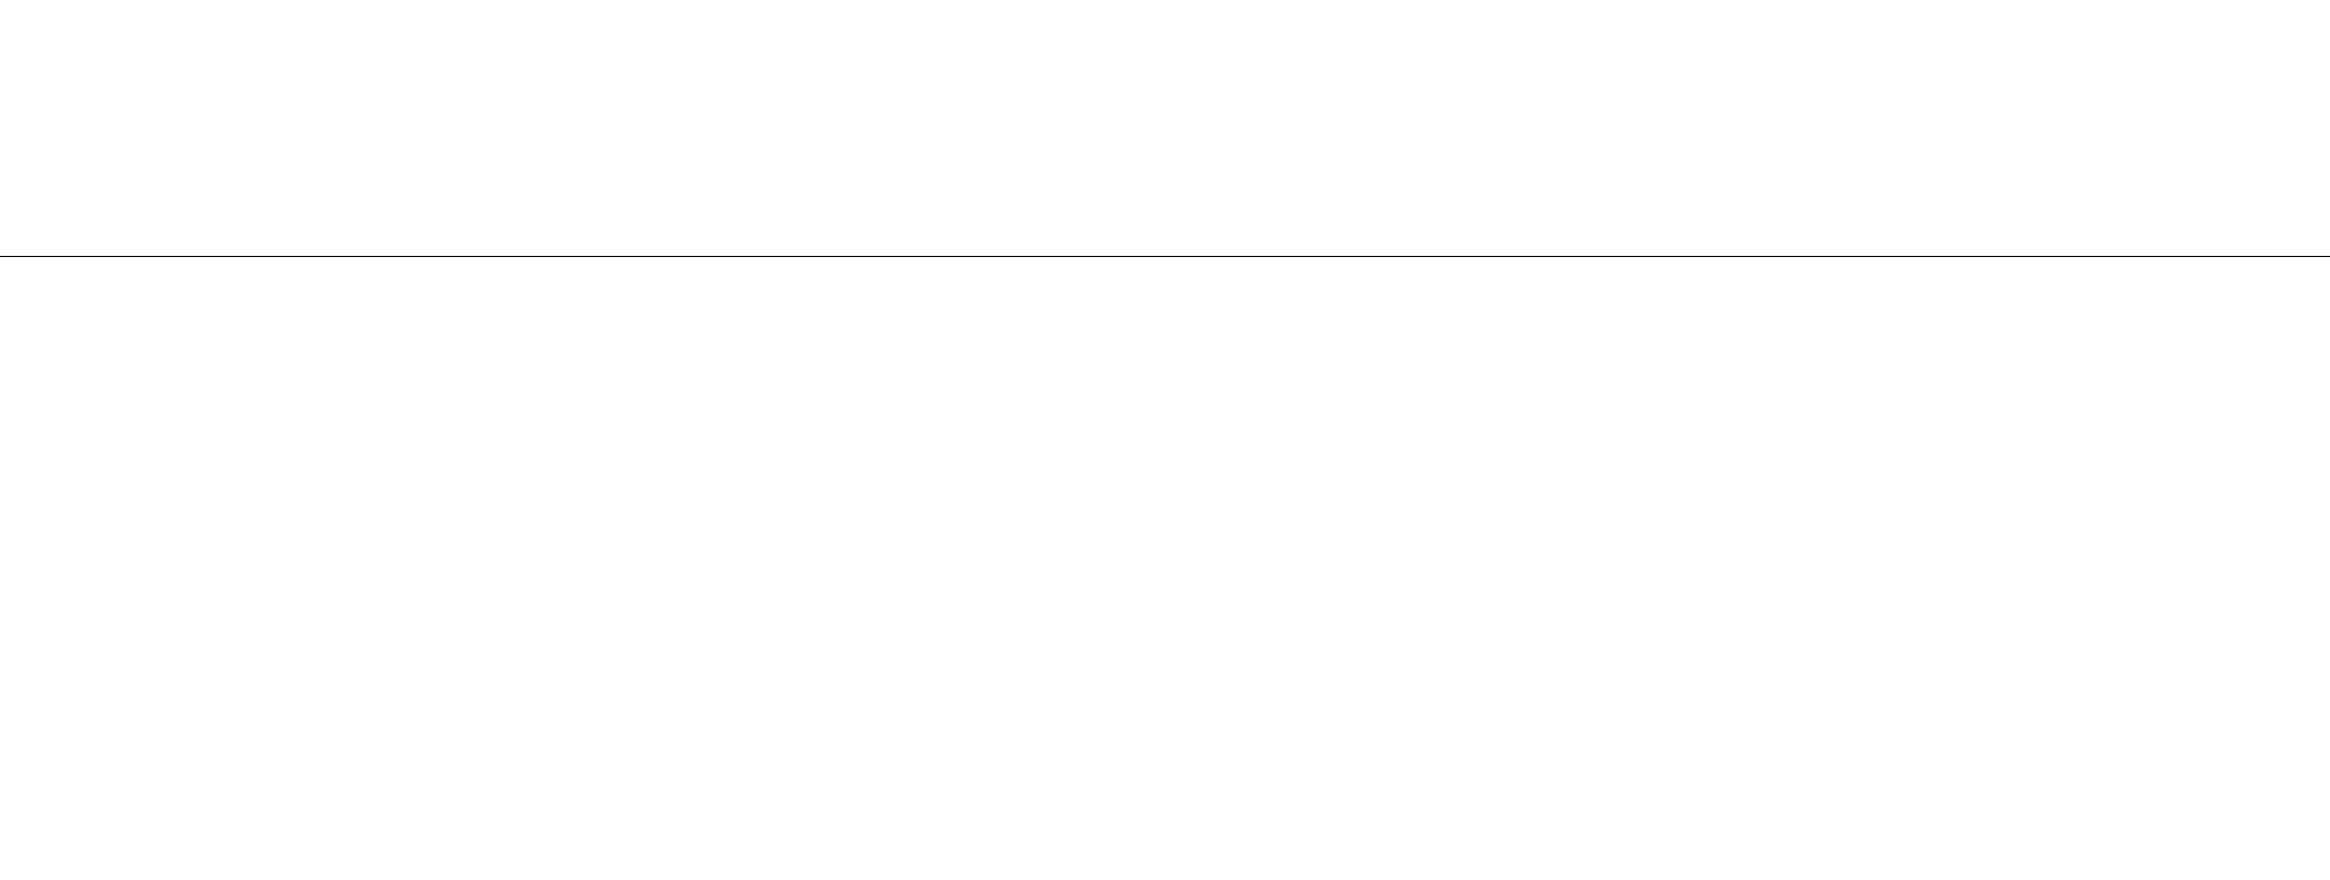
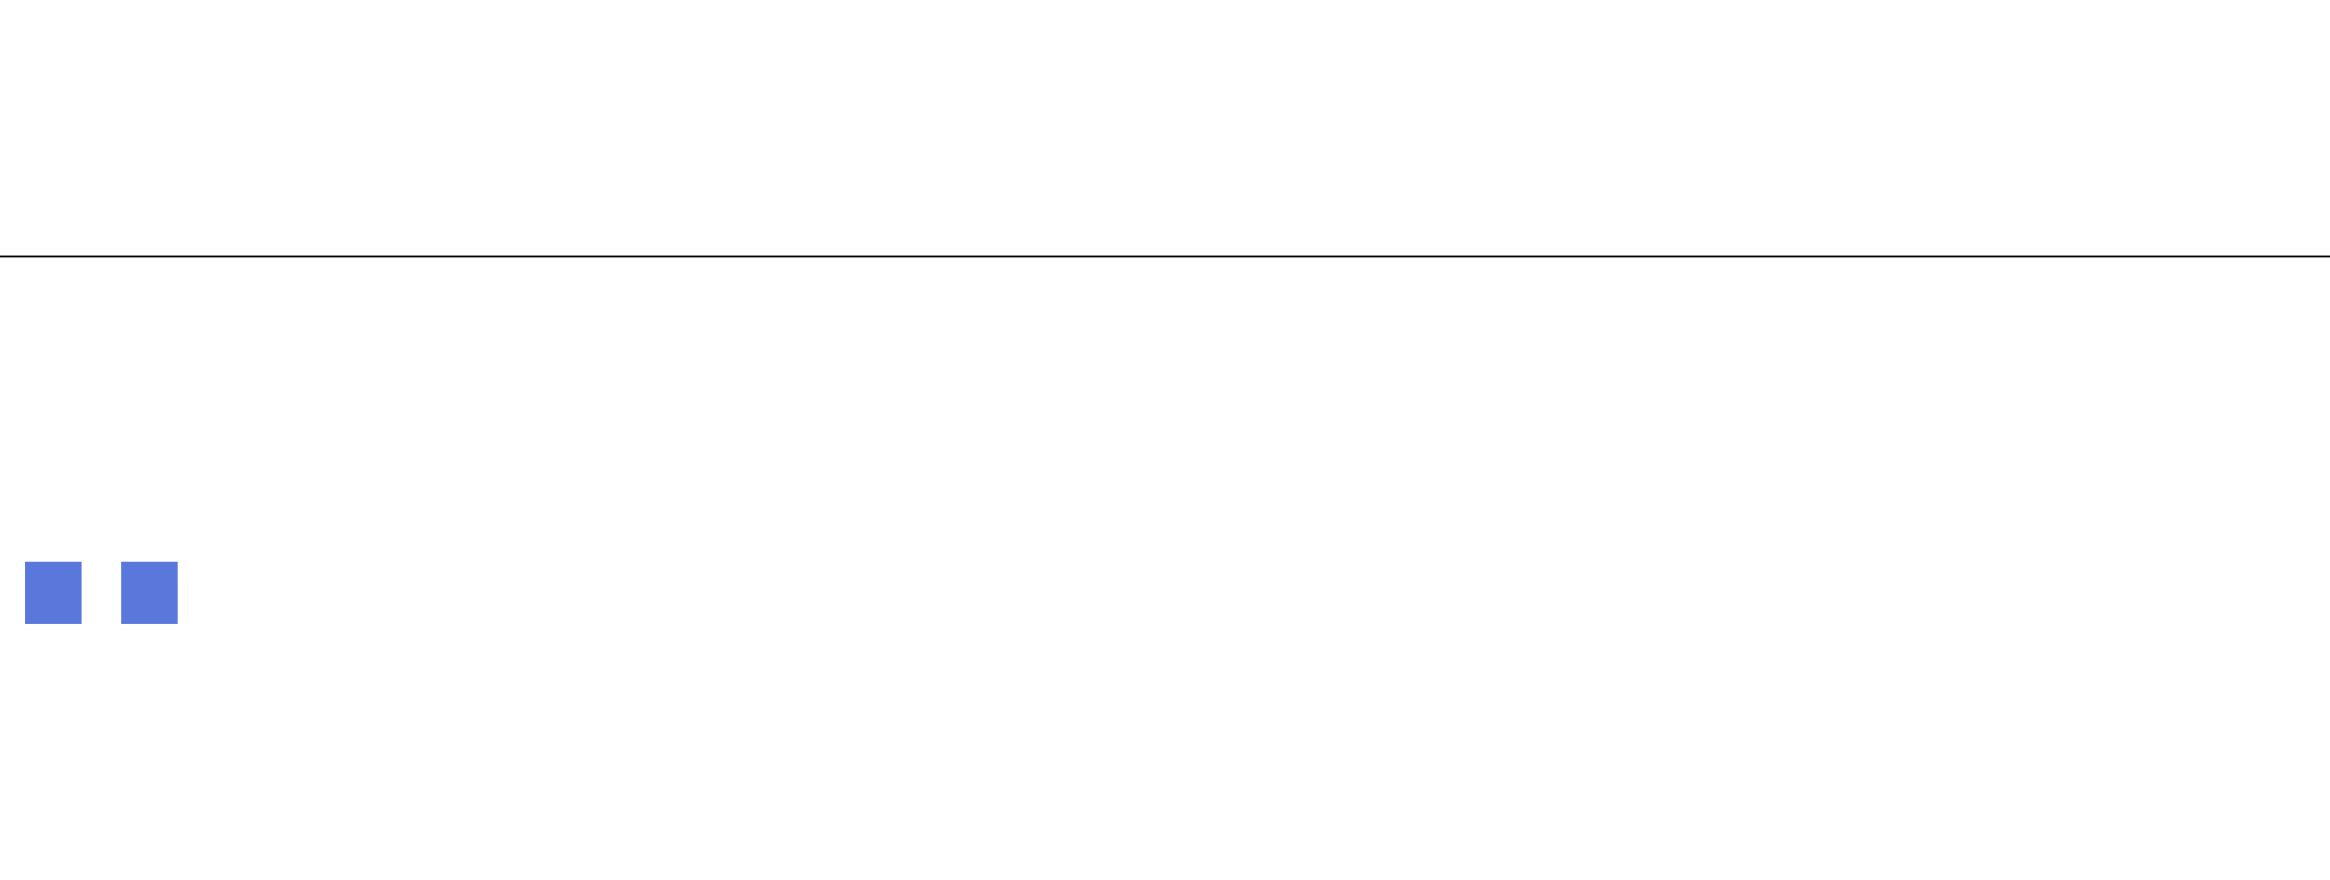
part: none -> (101, 592)

